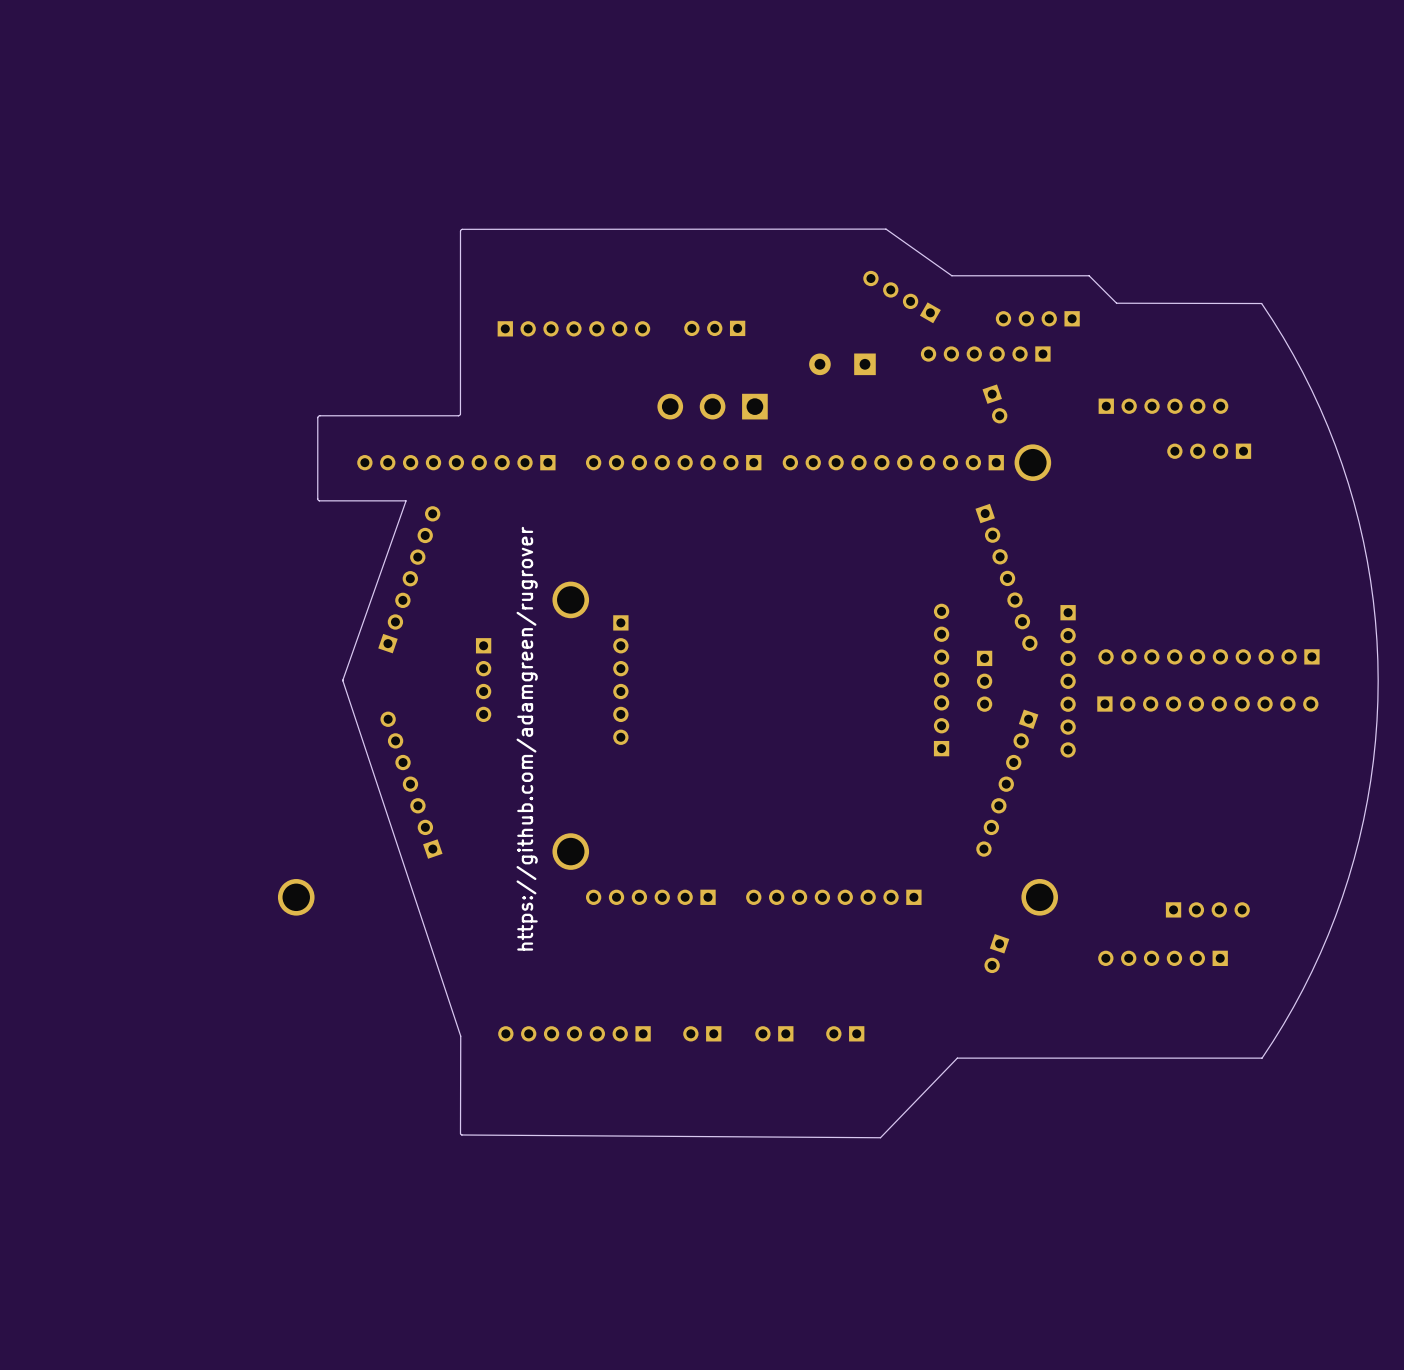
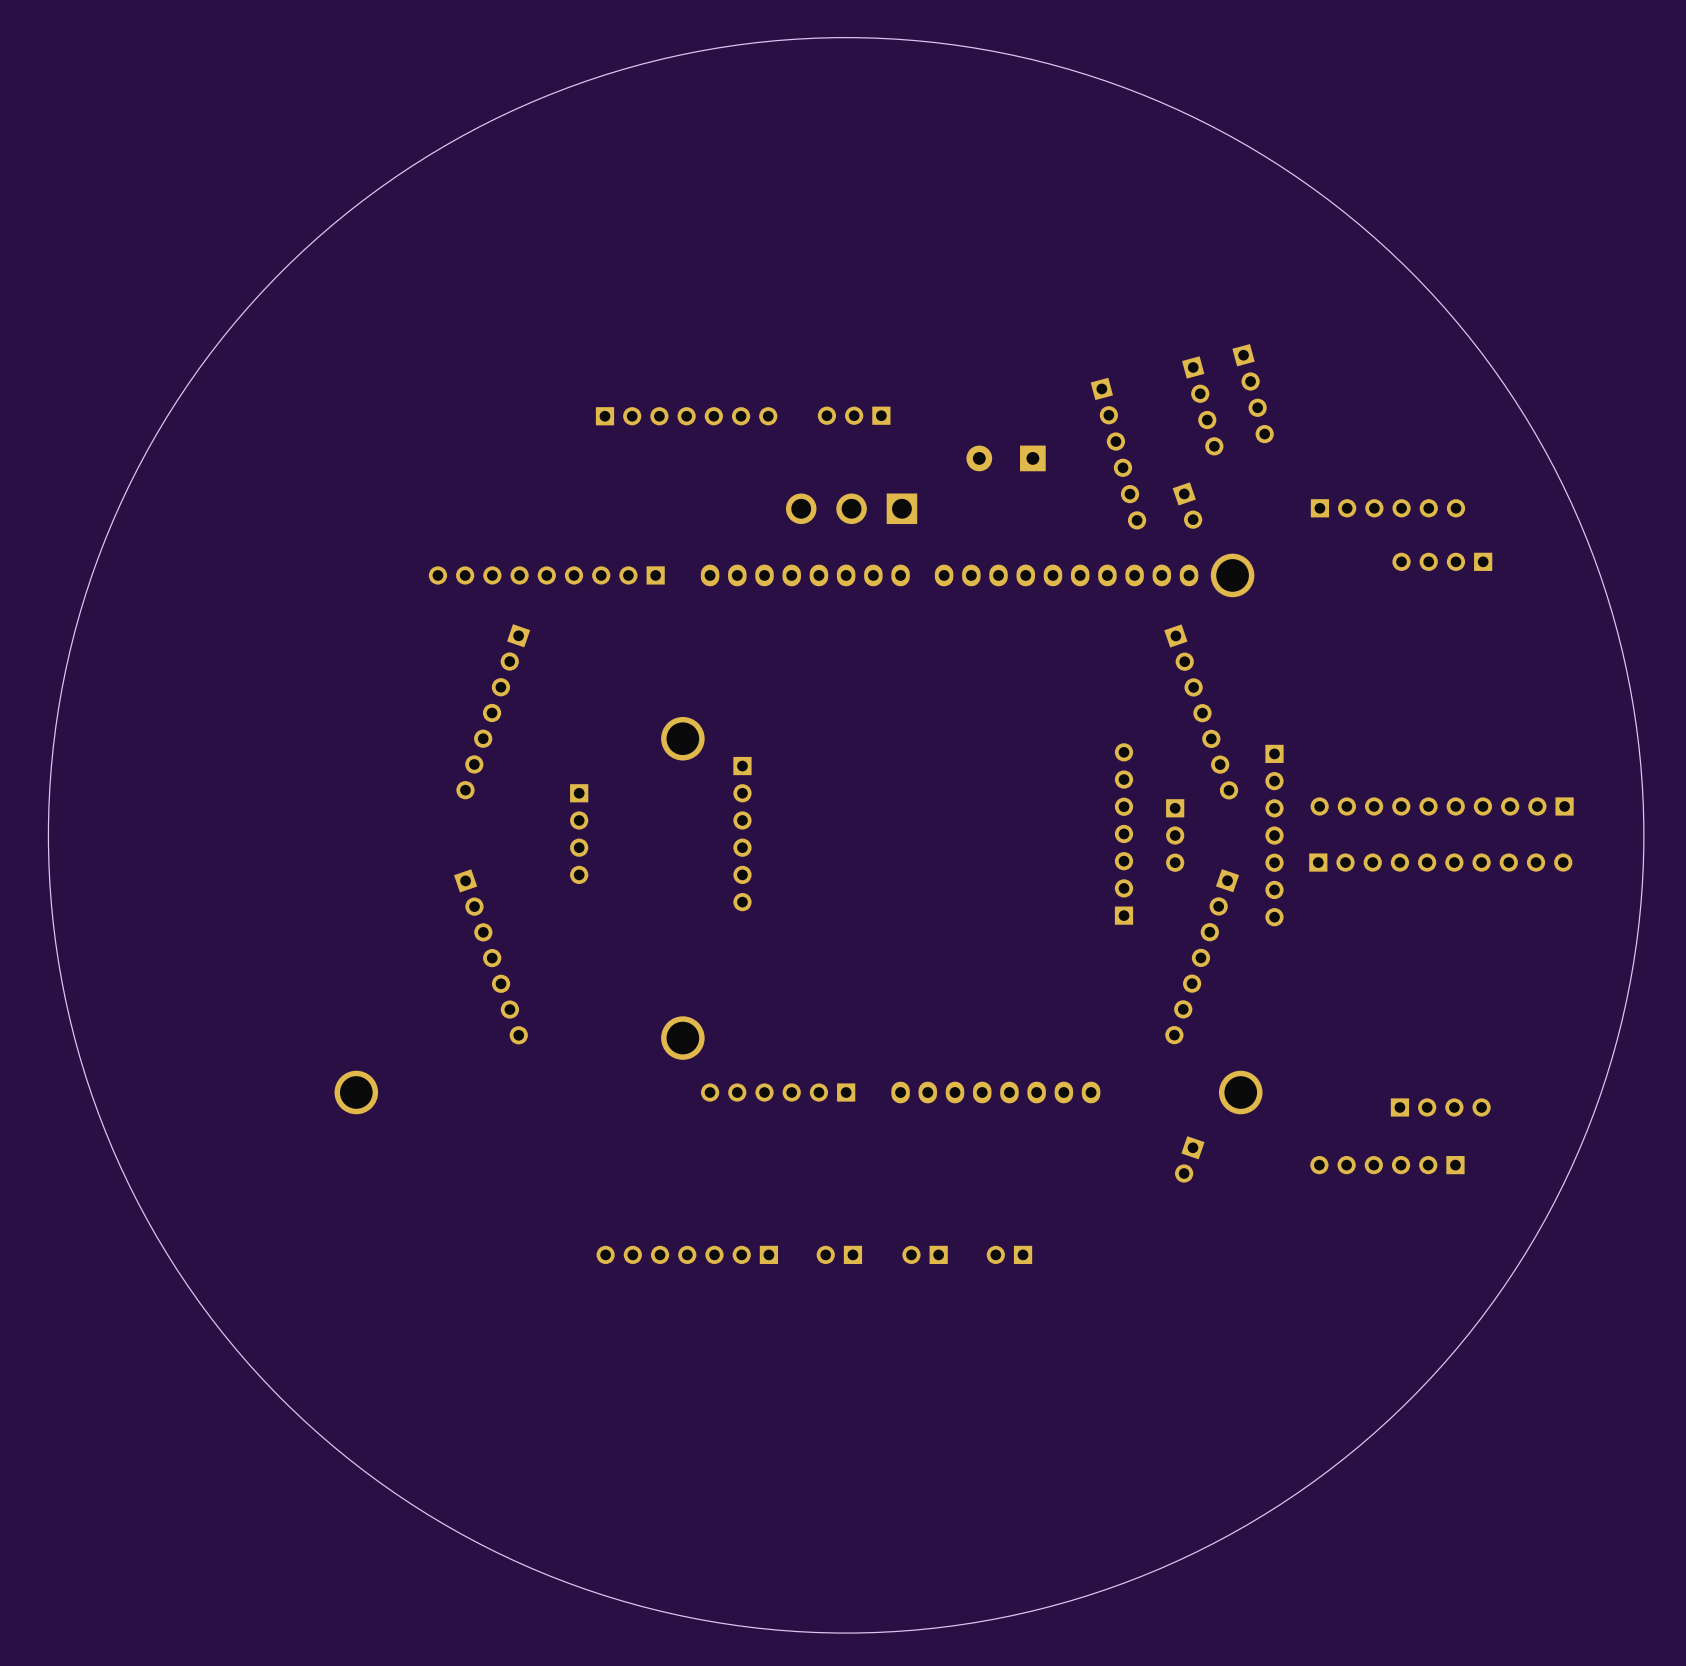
round board edge: none -> [47, 37, 1645, 1634]
board edge: (885, 229) (462, 229) (460, 231) (460, 414) (317, 417) (318, 500) (406, 500) (342, 680) (460, 1036) (461, 1134) (880, 1137) (957, 1058) (1262, 1058) (1283, 1024) (1312, 971) (1342, 897) (1363, 820) (1375, 740) (1377, 660) (1370, 580) (1353, 502) (1328, 426) (1293, 354) (1261, 303) (1116, 303) (1089, 275) (951, 275) (885, 229) -> none
part: (902, 297) -> none
part: none -> (1253, 393)
part: (1037, 318) -> none
part: none -> (1202, 405)
part: (985, 354) -> none
part: none -> (1118, 453)
part footprint: [585, 455, 762, 471] -> [700, 564, 910, 587]
part footprint: [782, 455, 1004, 471] -> [934, 564, 1199, 587]
part rotation: 0° (409, 579) -> 180° (493, 711)
text: https://github.com/adamgreen/rugrover (527, 738) -> none
part rotation: 0° (411, 785) -> 180° (490, 956)
part footprint: [746, 889, 922, 905] -> [891, 1081, 1101, 1104]

